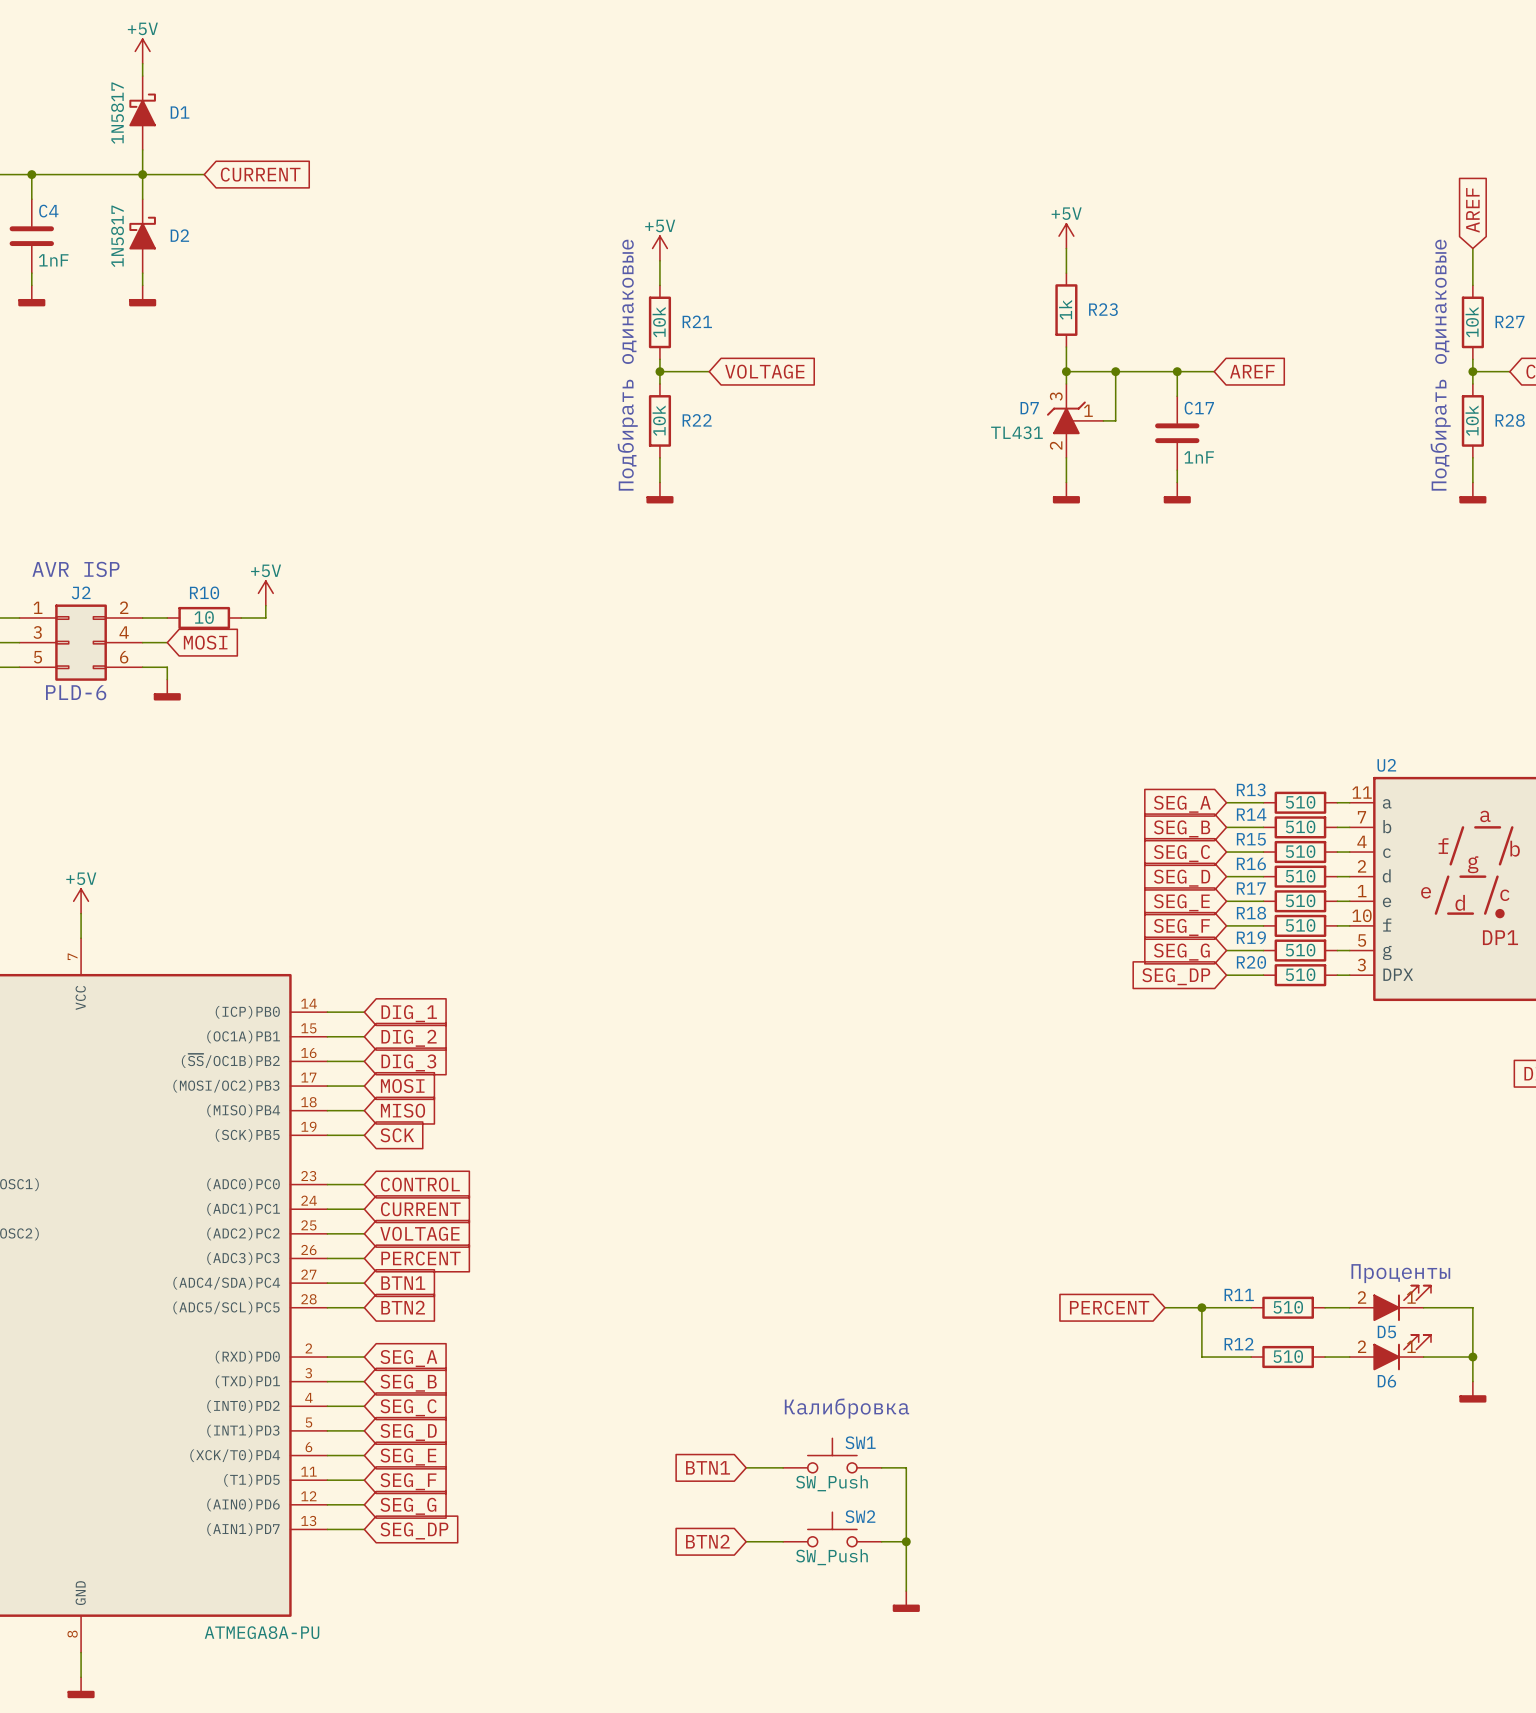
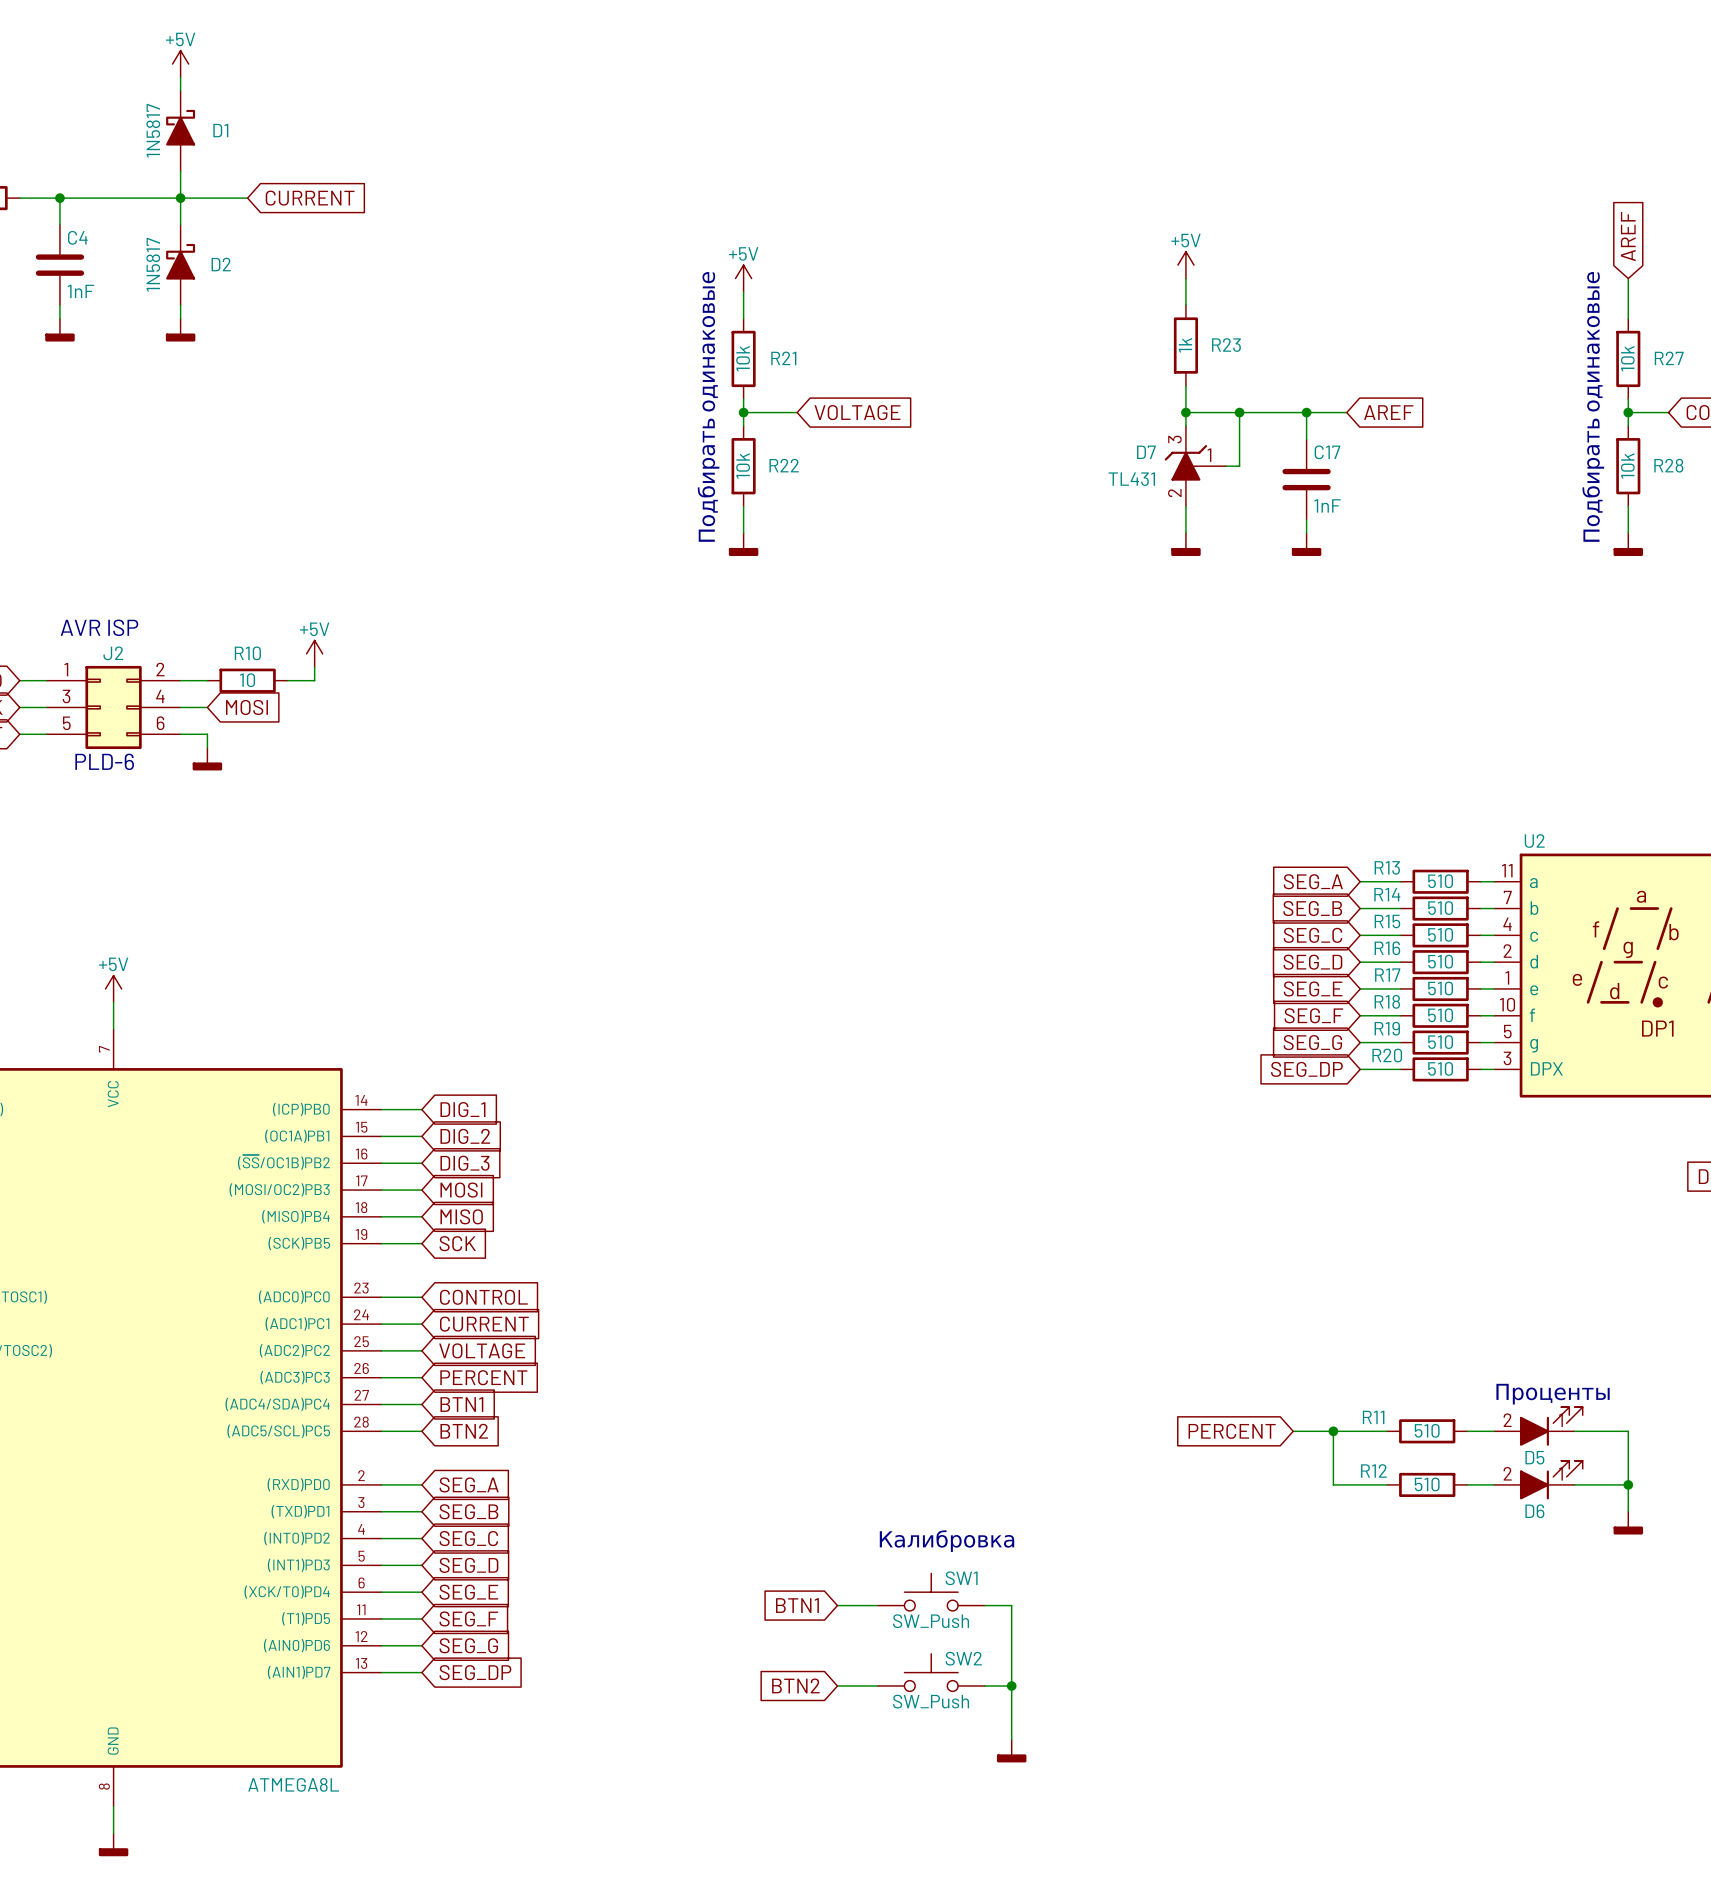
part value: ATMEGA8A-PU (262, 1632) -> ATMEGA8L (293, 1784)

